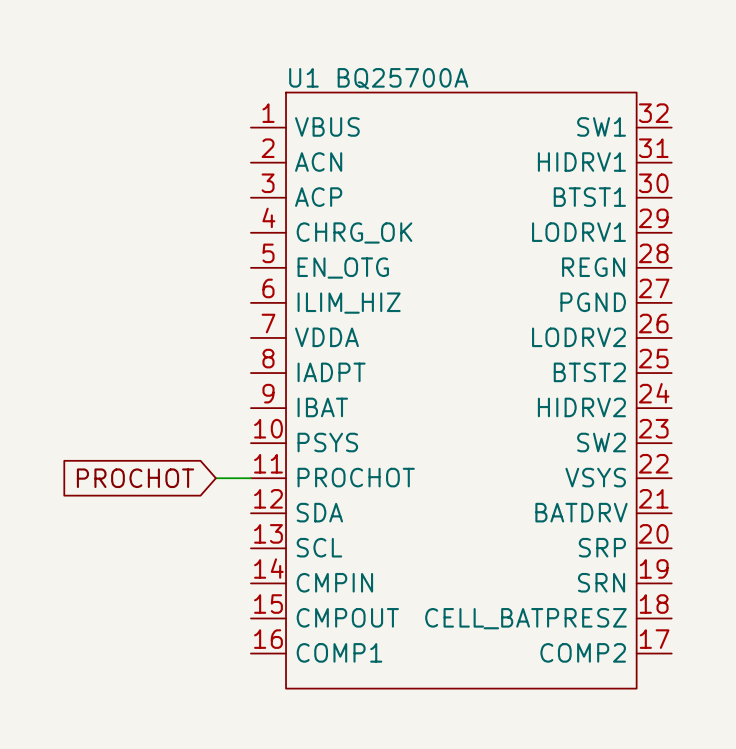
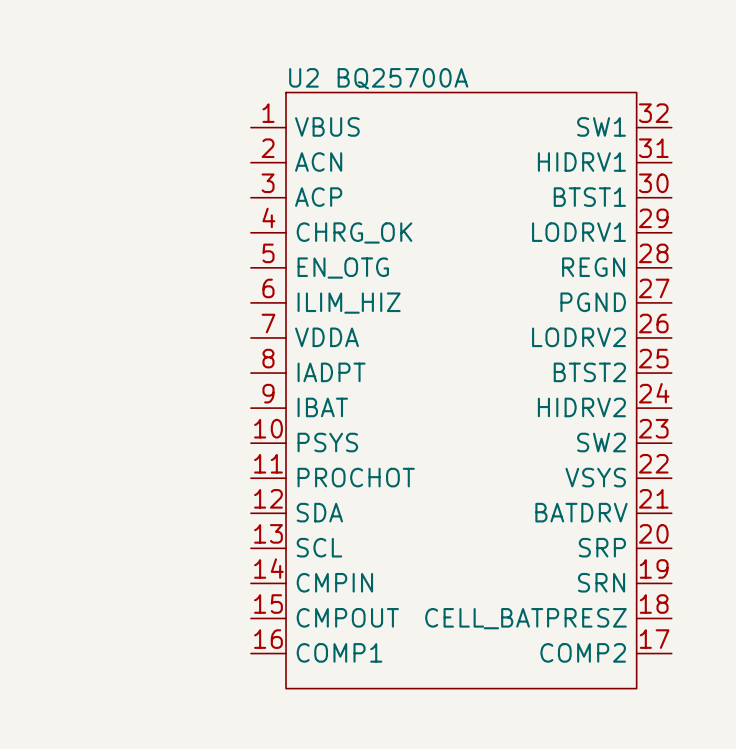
U1 name: U1 (303, 77) -> U2 (303, 77)
global label: PROCHOT (135, 478) -> none
wire: (215, 478) (250, 478) -> none

